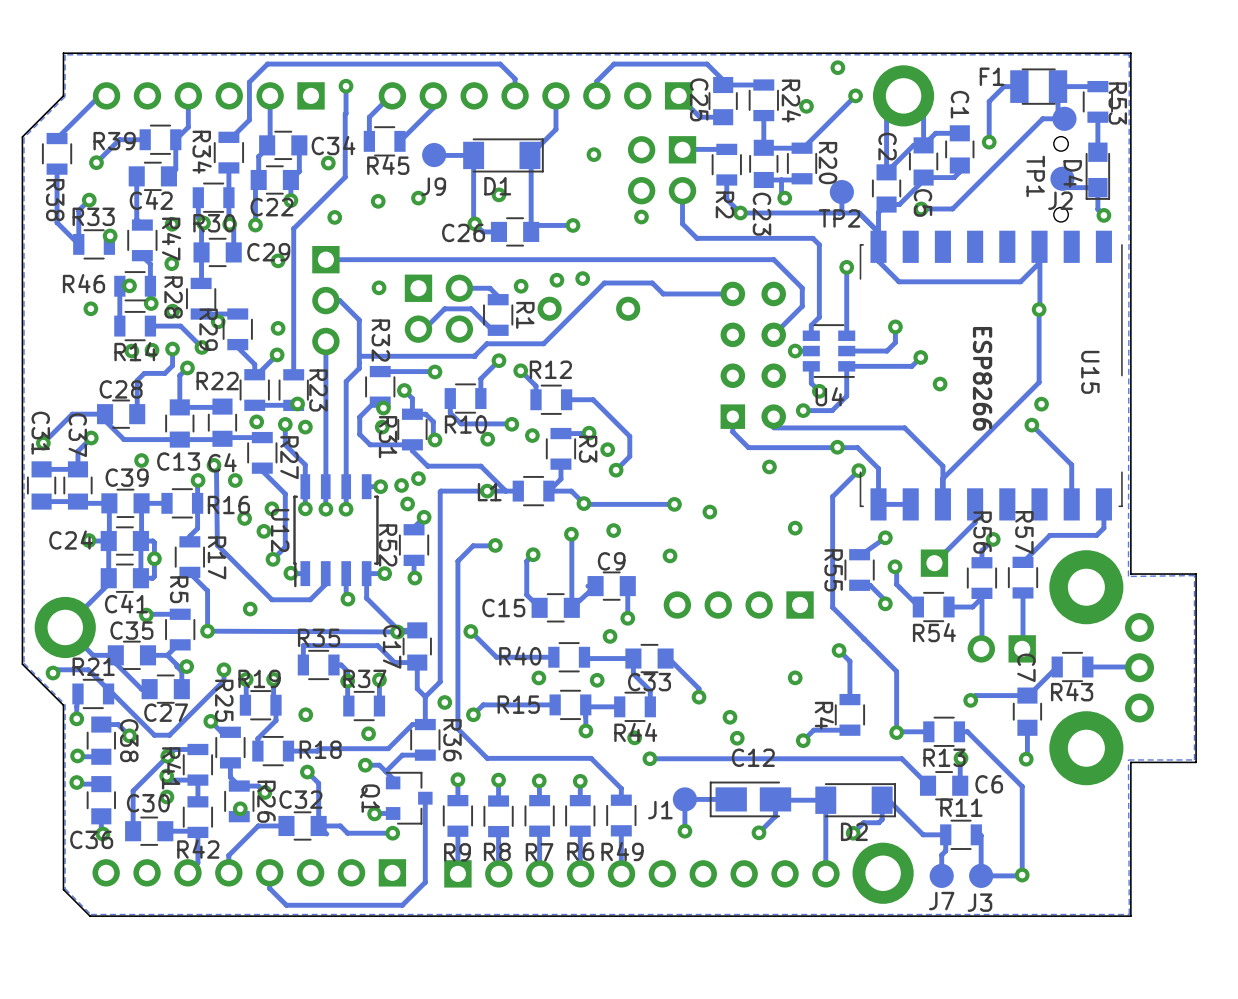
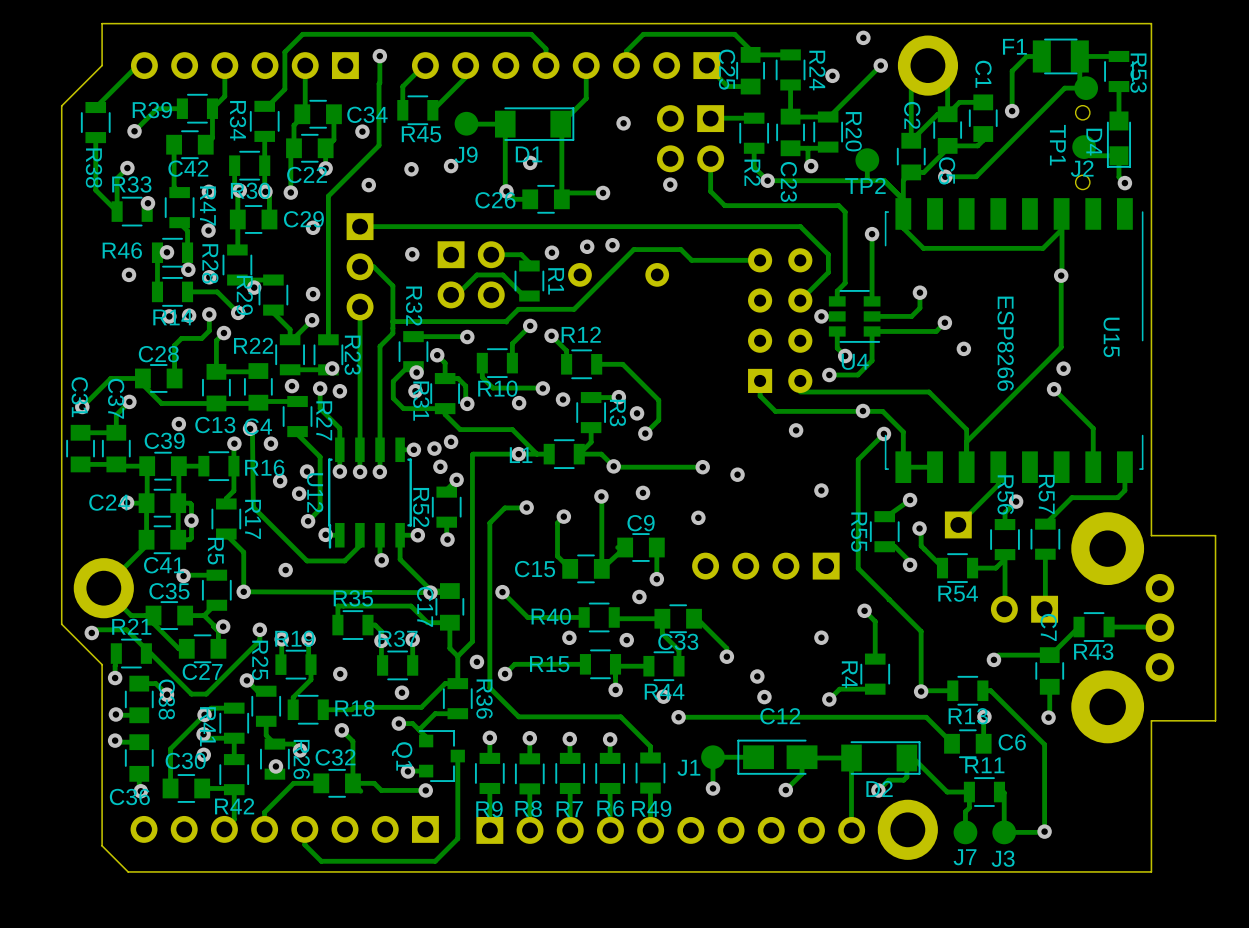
zone outline: (1129, 54) (65, 54) (65, 96) (24, 137) (24, 663) (65, 704) (65, 888) (90, 914) (1129, 914) (1128, 759) (1194, 759) (1194, 575) (1128, 576) (1129, 54) -> none

